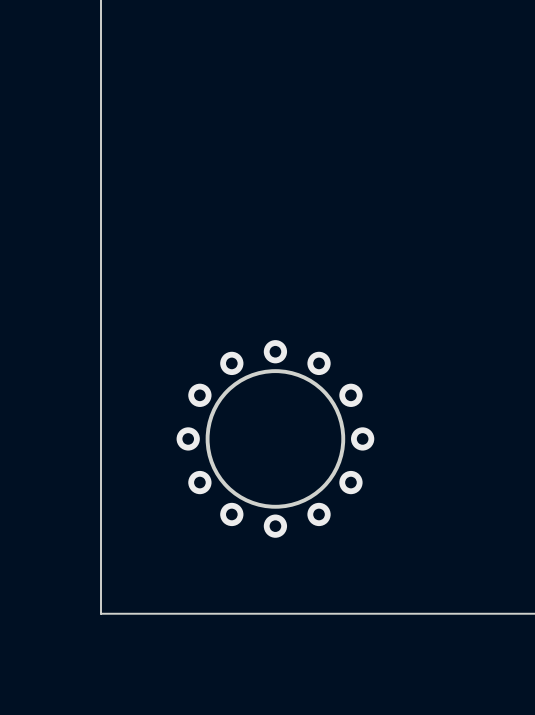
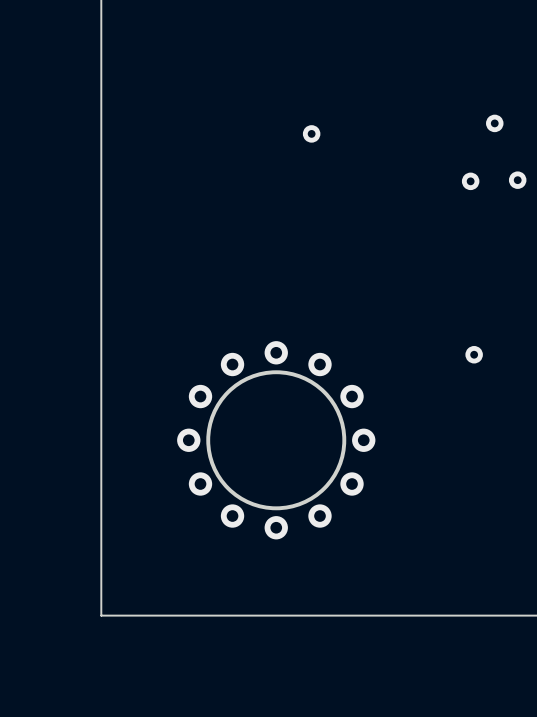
via: none -> (494, 123)
via: none -> (311, 133)
via: none -> (517, 180)
via: none -> (470, 181)
via: none -> (474, 354)

